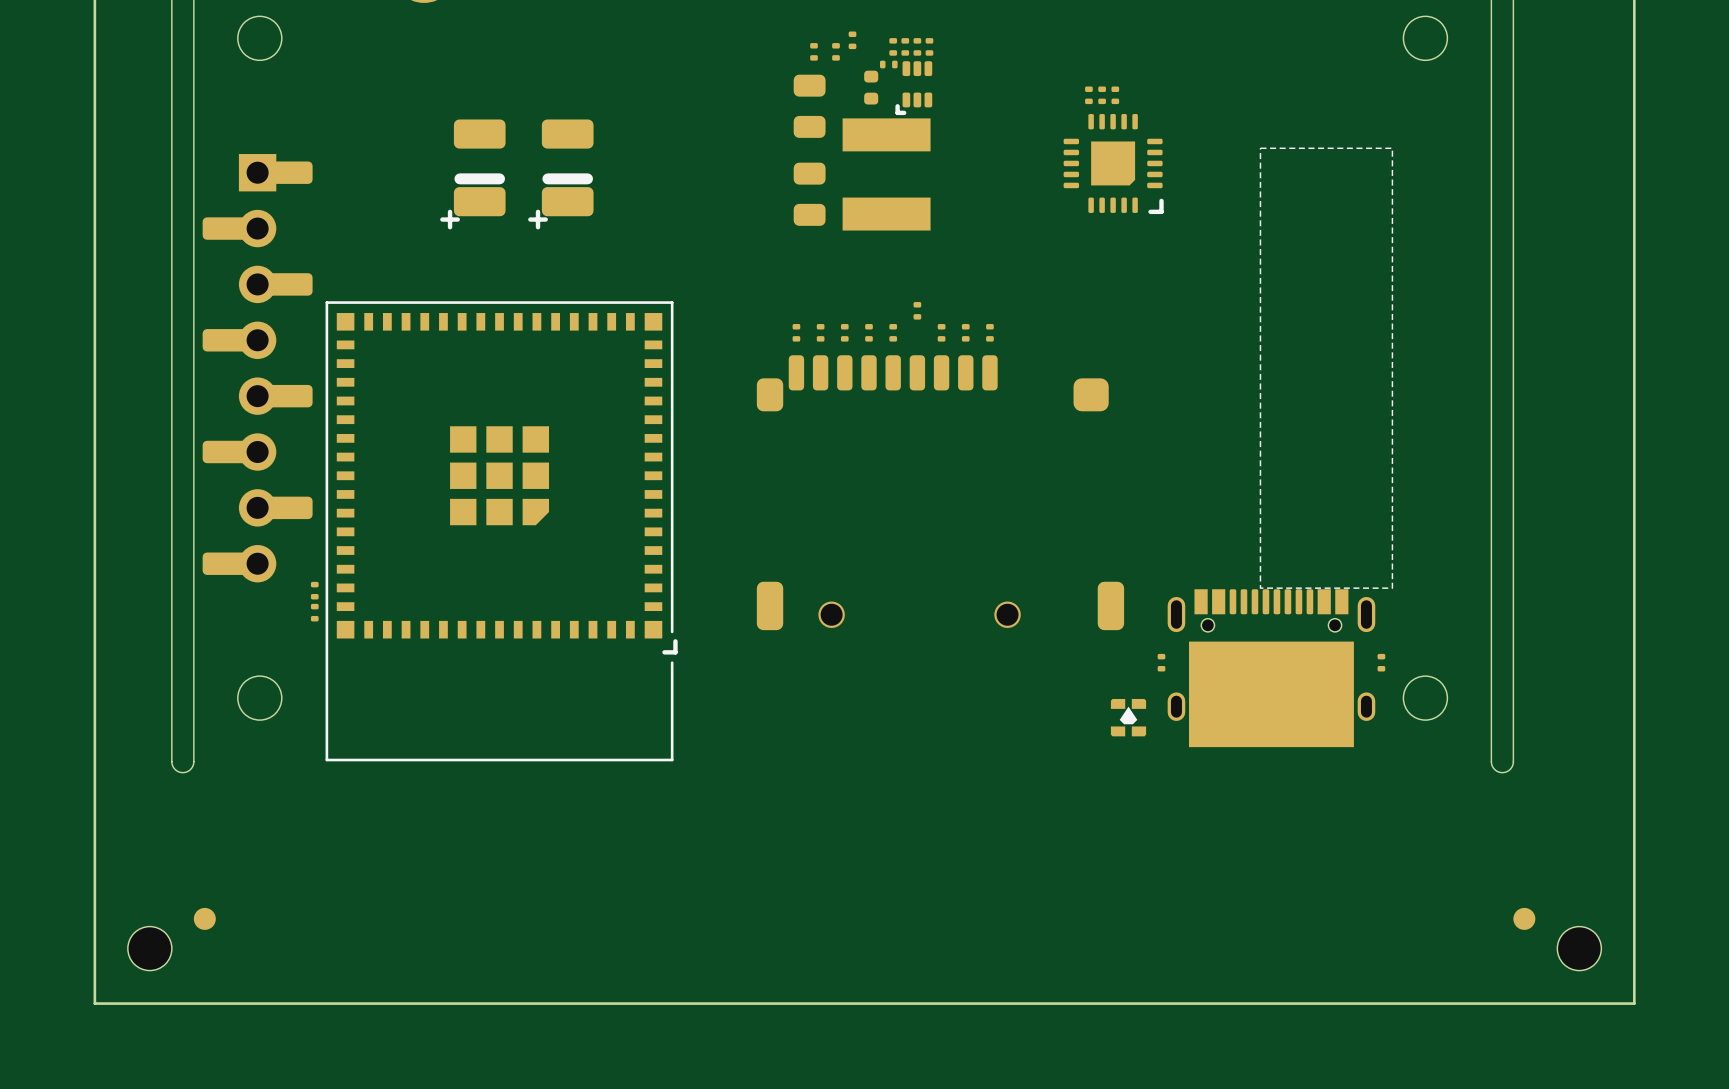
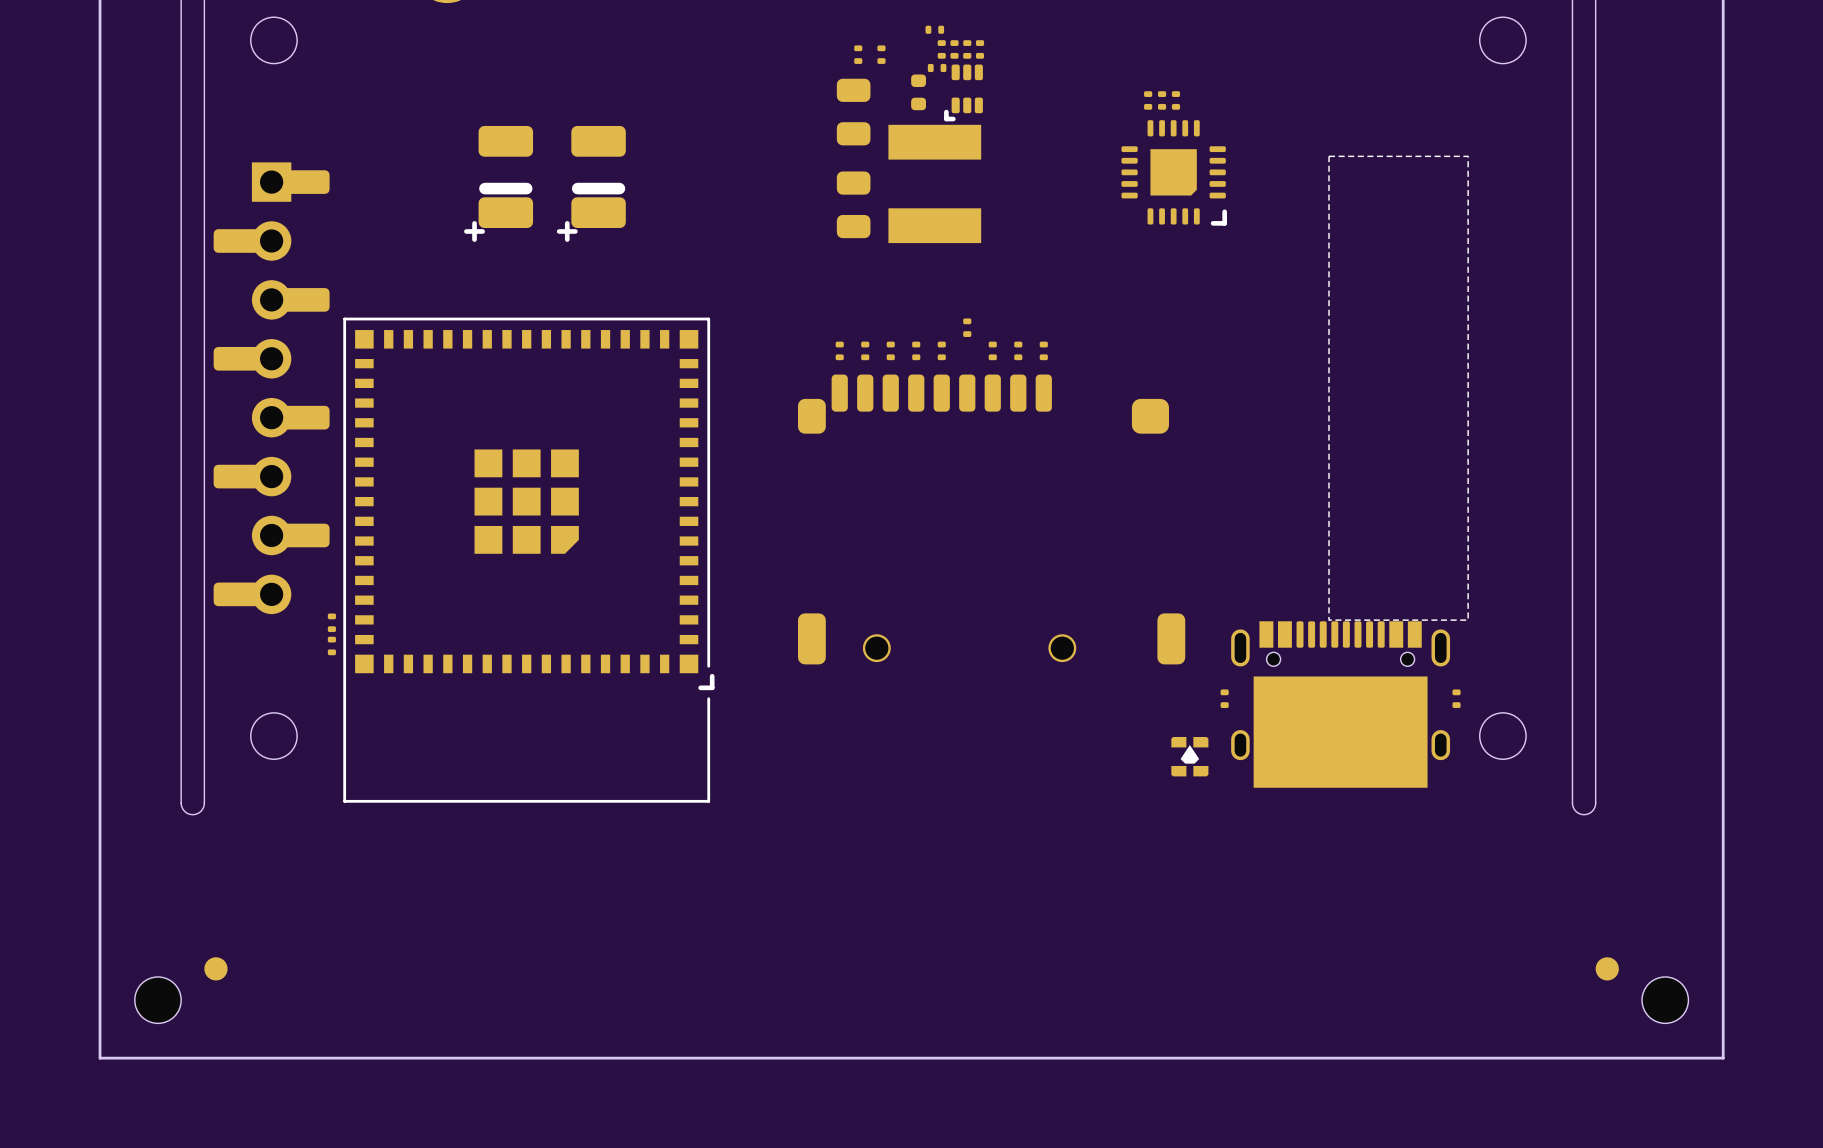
part rotation: 0° (852, 40) -> 90° clockwise (934, 29)
part position: (852, 40) -> (934, 29)

